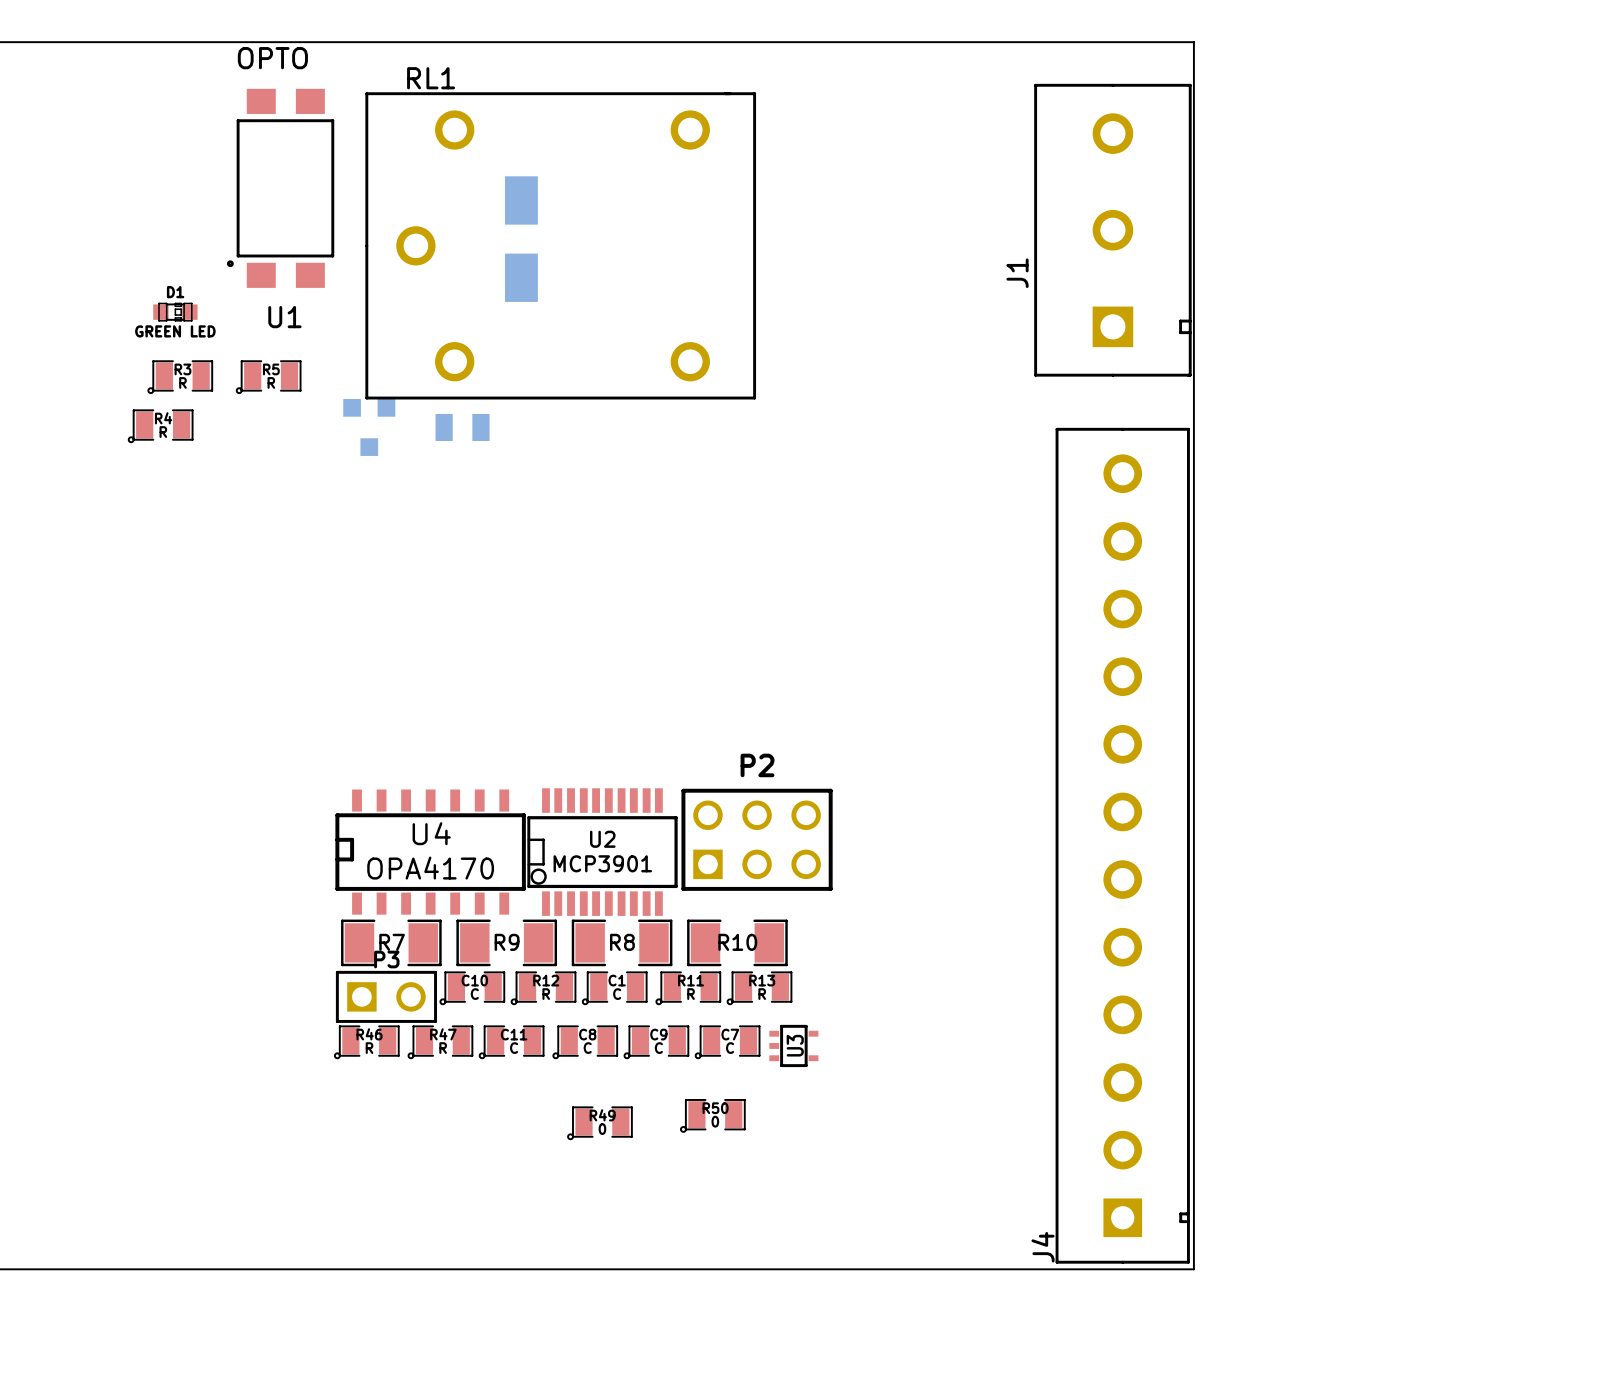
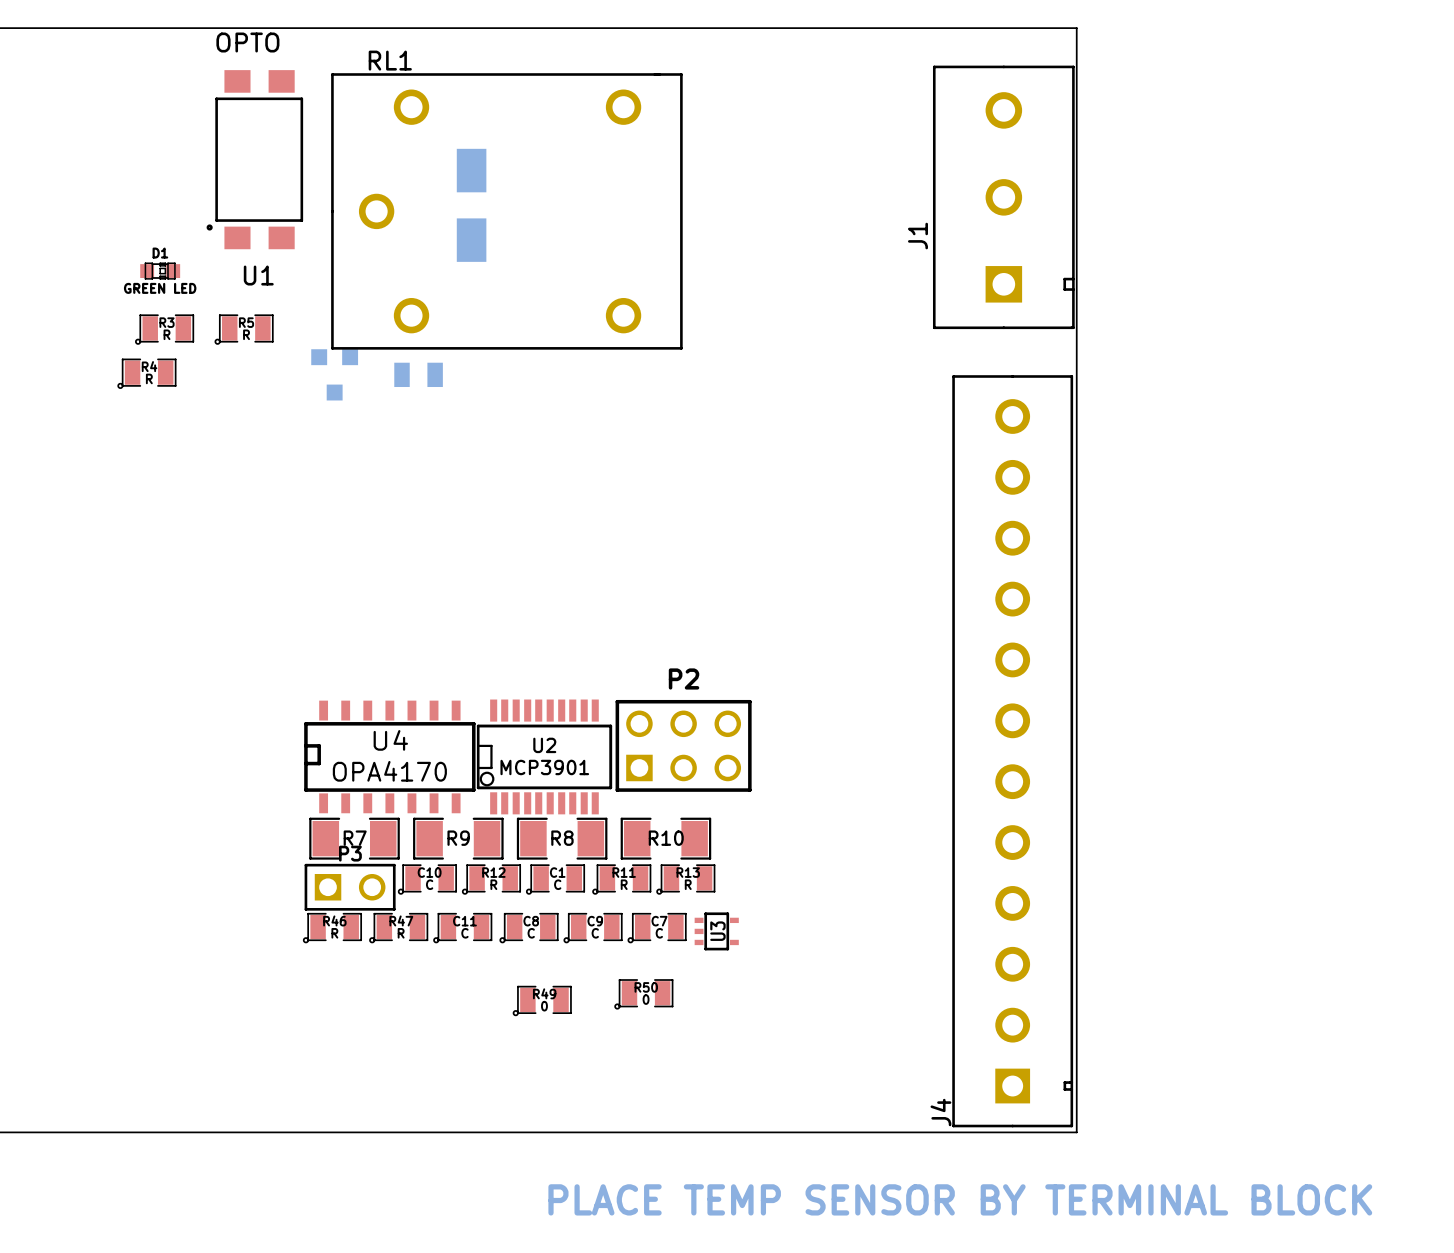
text: none -> PLACE TEMP SENSOR BY TERMINAL BLOCK (960, 1199)

